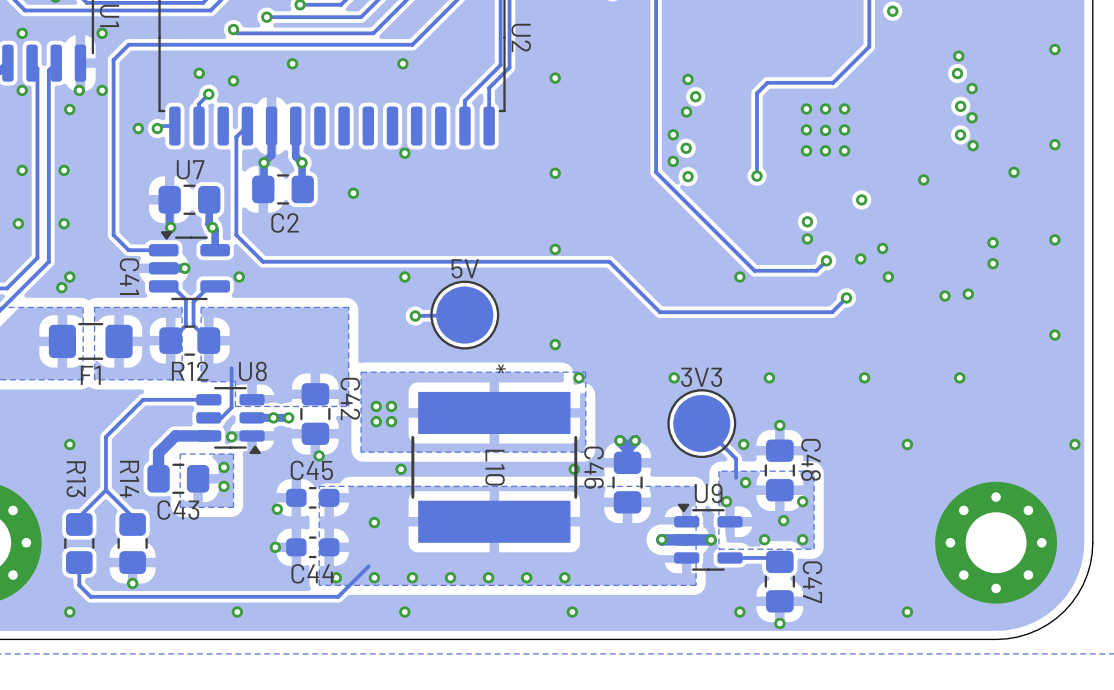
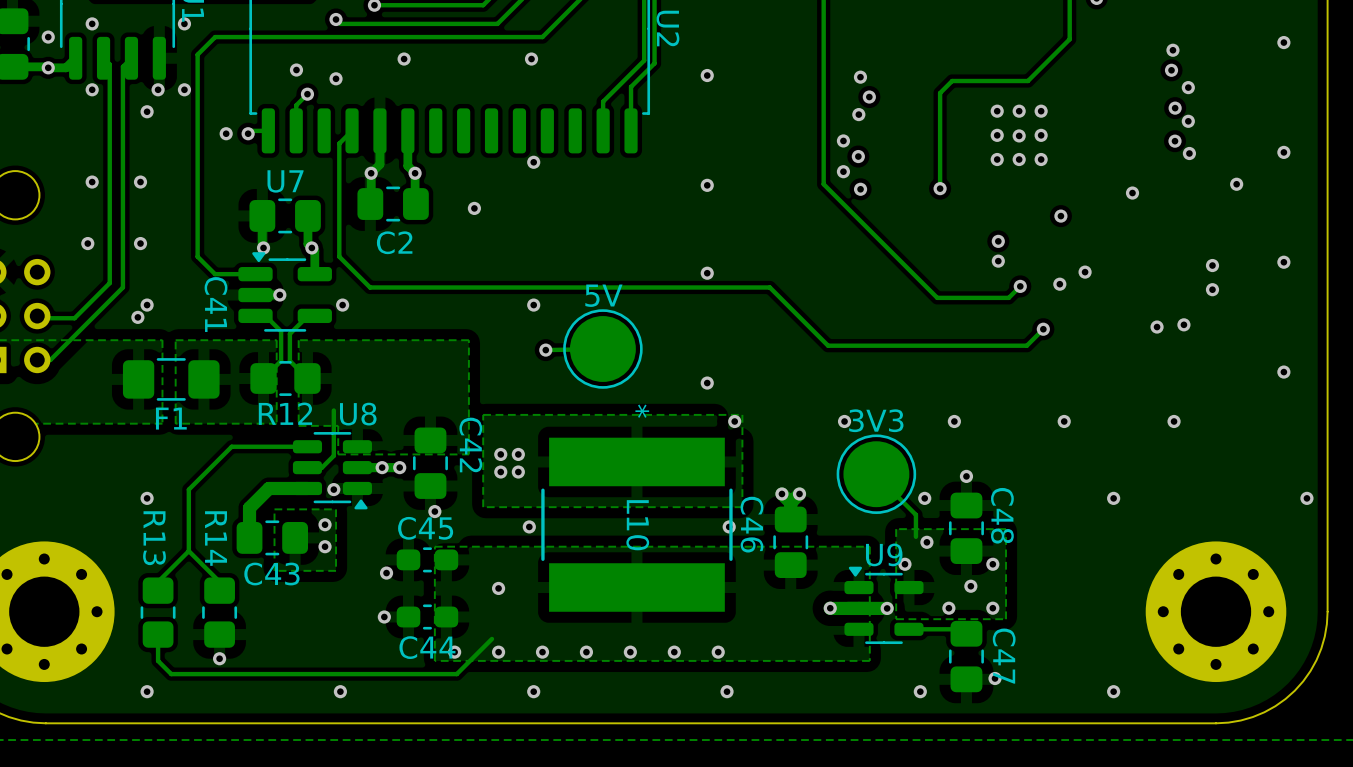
via: (739, 277) -> none
via: (888, 277) -> none
via position: (779, 623) -> (995, 678)

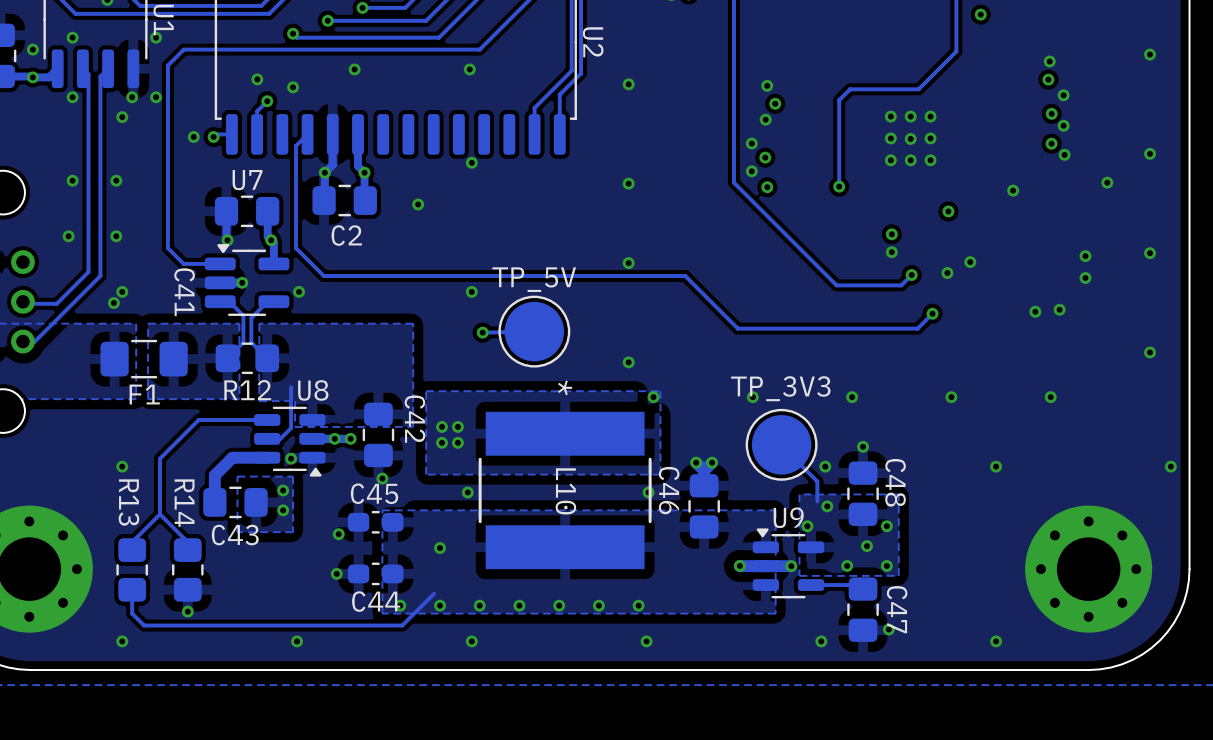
5V value: none -> TP_5V (534, 279)
5V name: 5V (603, 295) -> none
3V3 value: none -> TP_3V3 (780, 388)
3V3 name: 3V3 (876, 420) -> none

